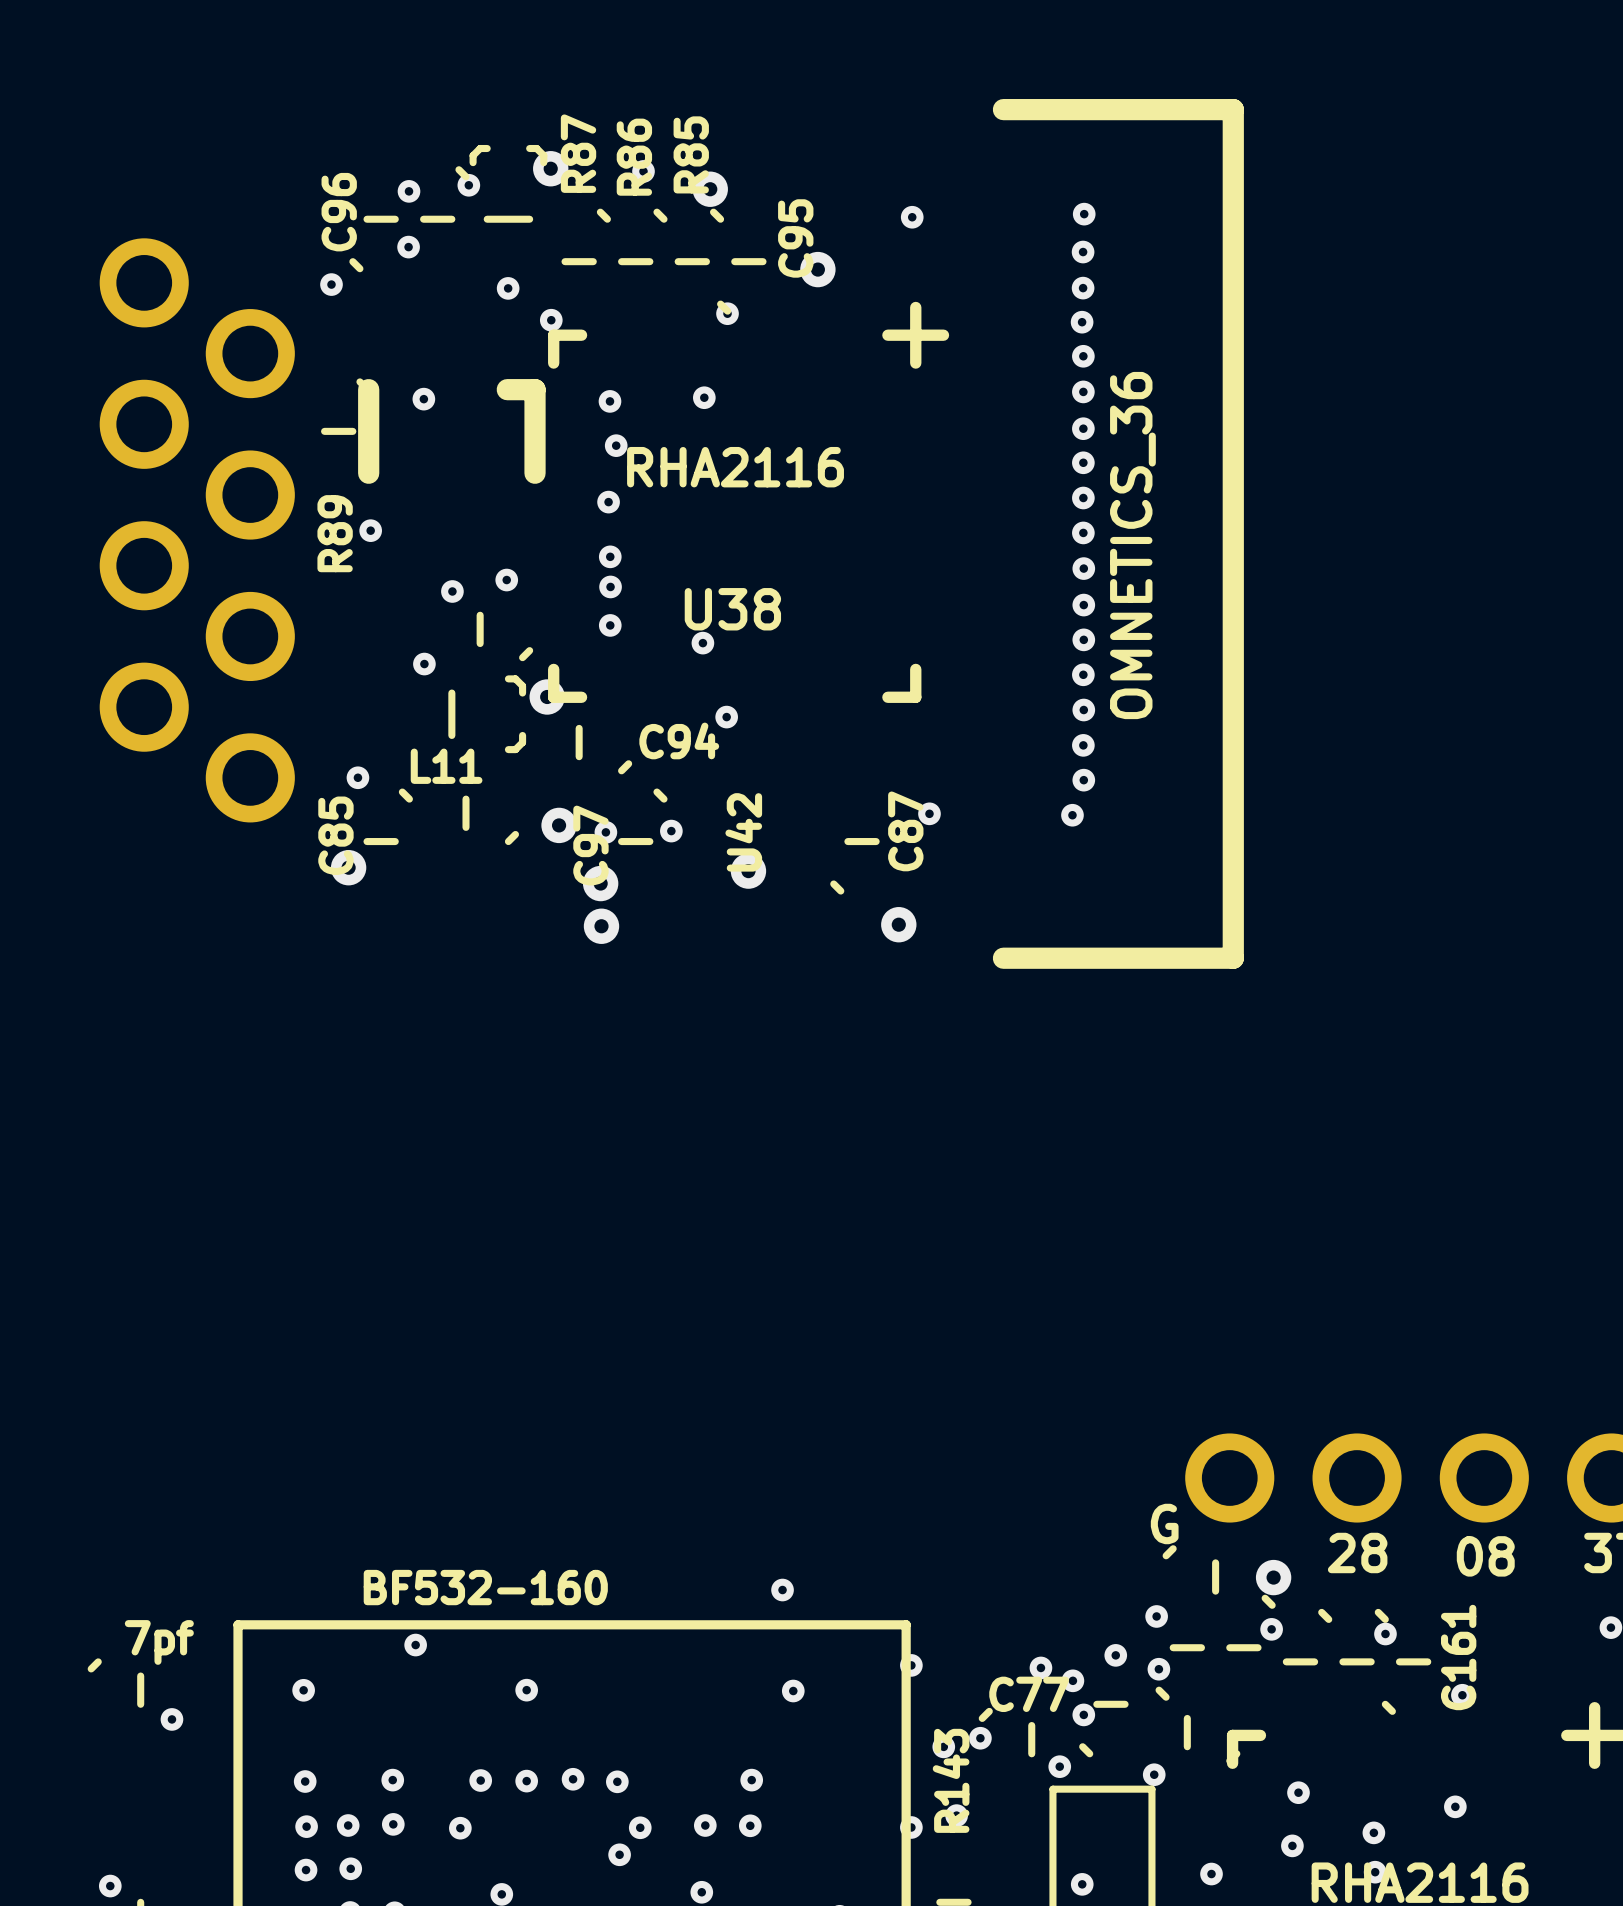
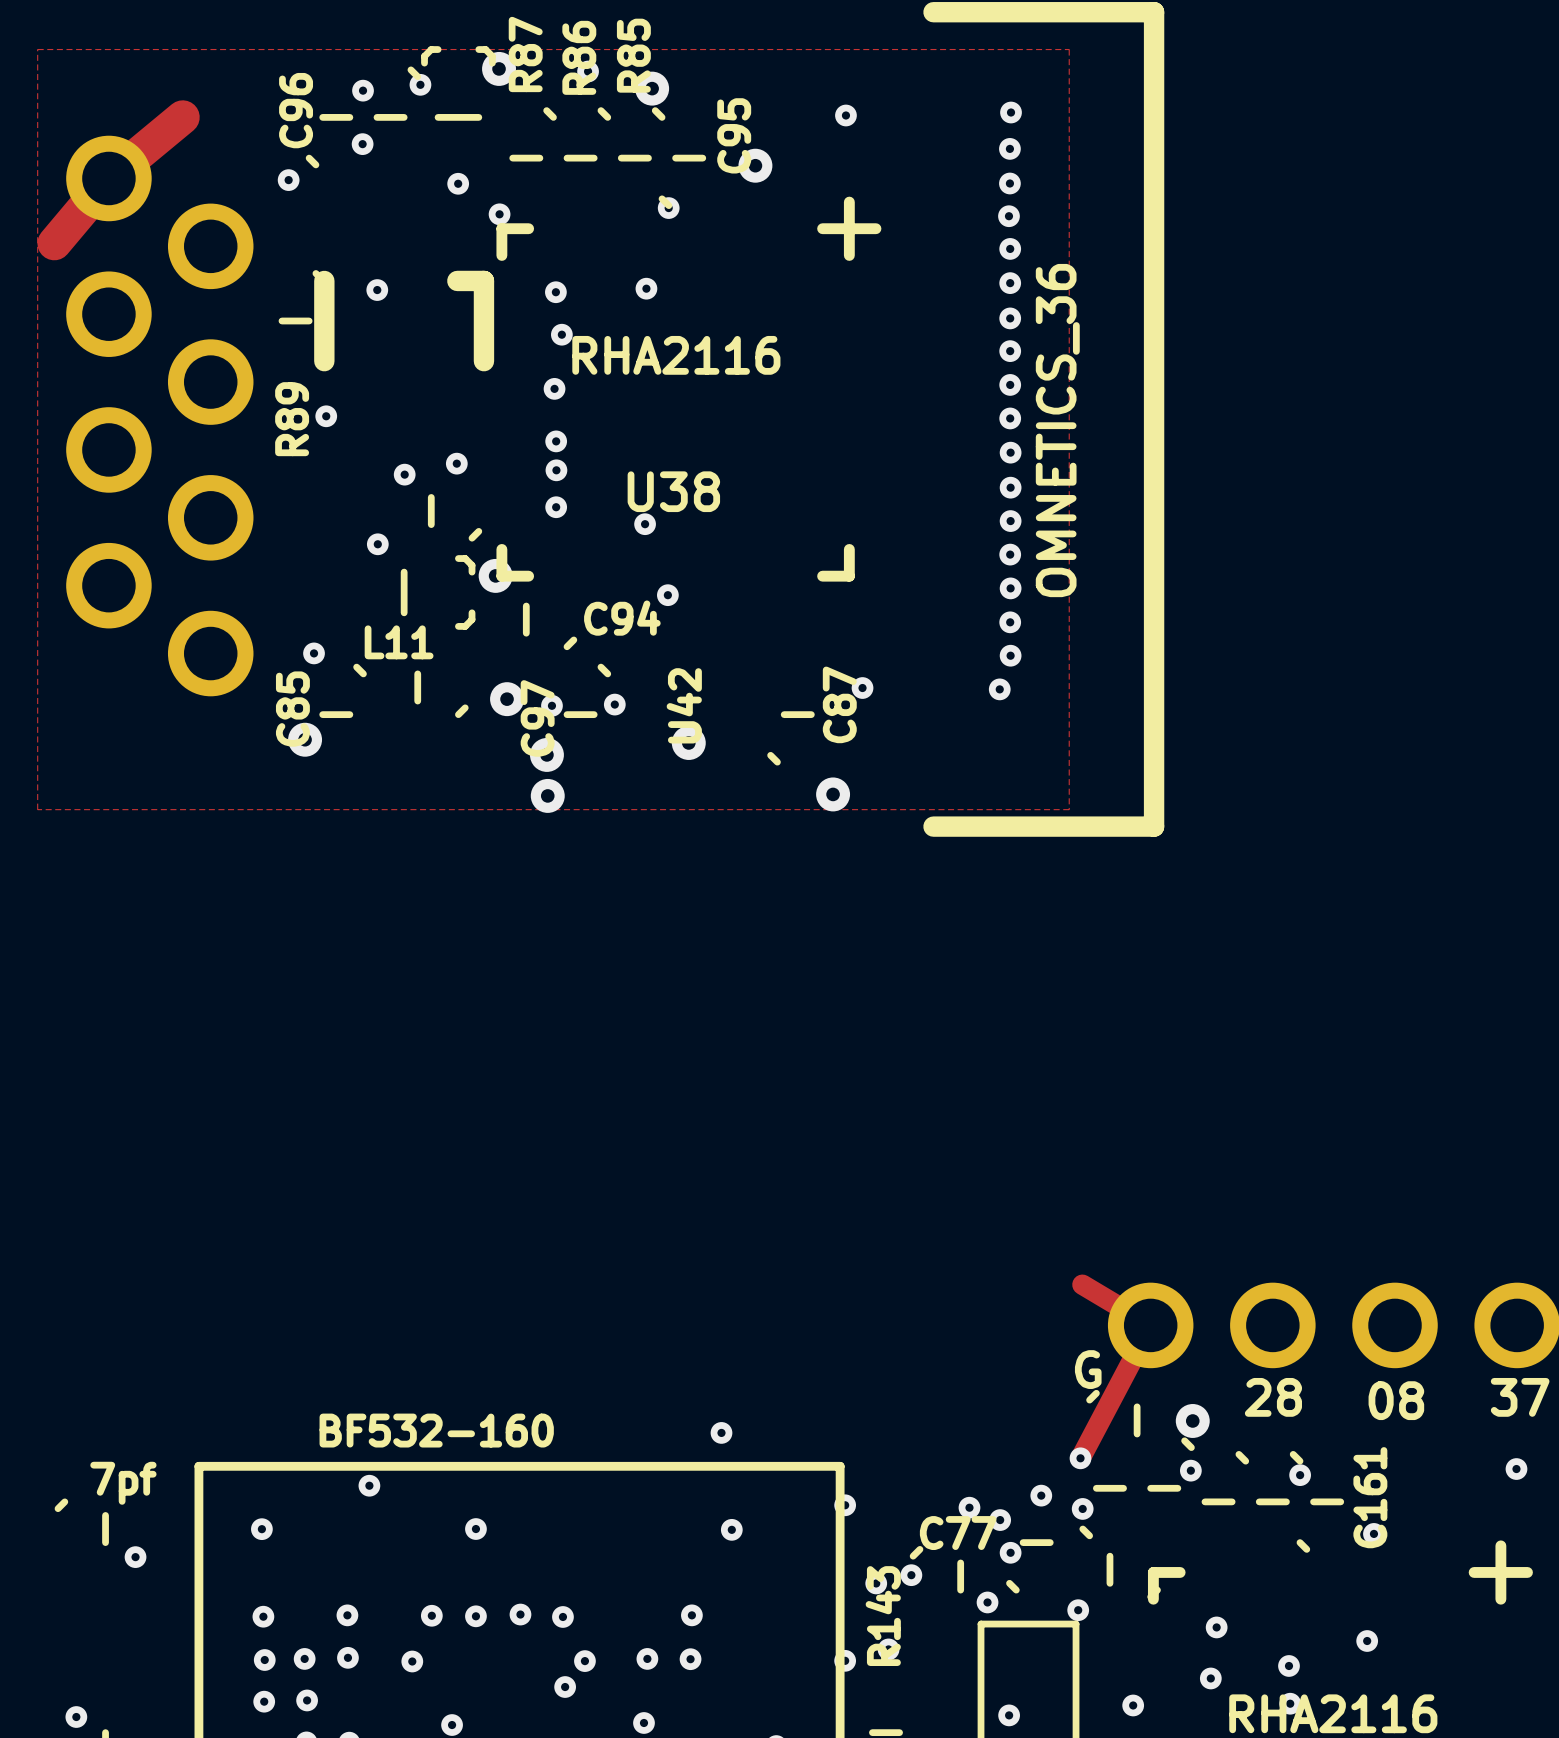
zone outline: none -> (37, 49) (37, 809) (1069, 809) (1069, 49) (37, 49)
track: none -> (182, 117) (108, 178) (54, 243)
track: none -> (1082, 1284) (1150, 1325) (1080, 1458)

